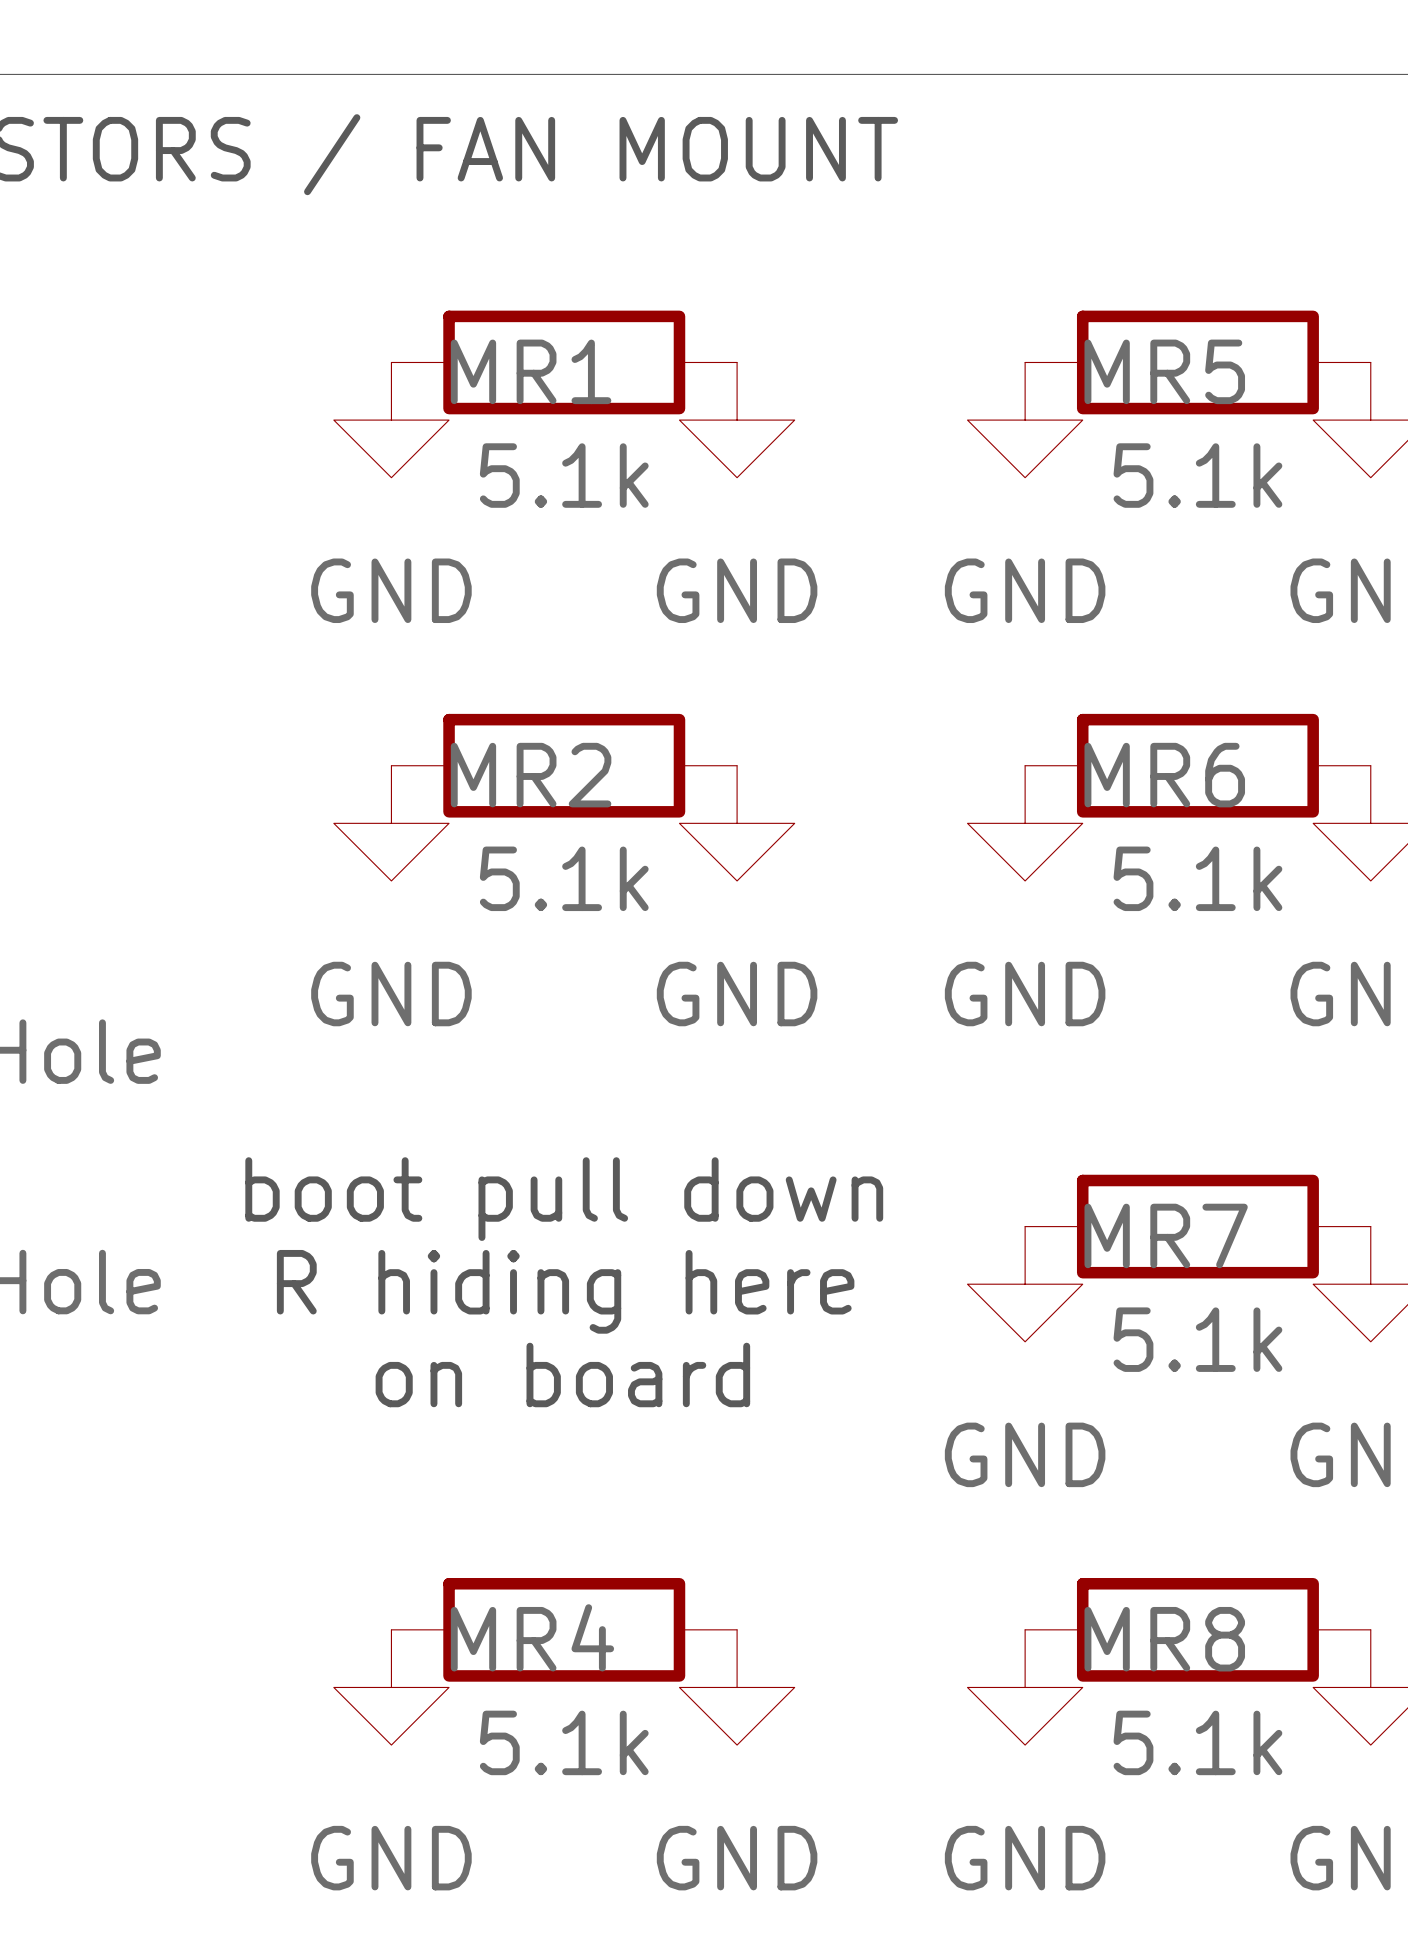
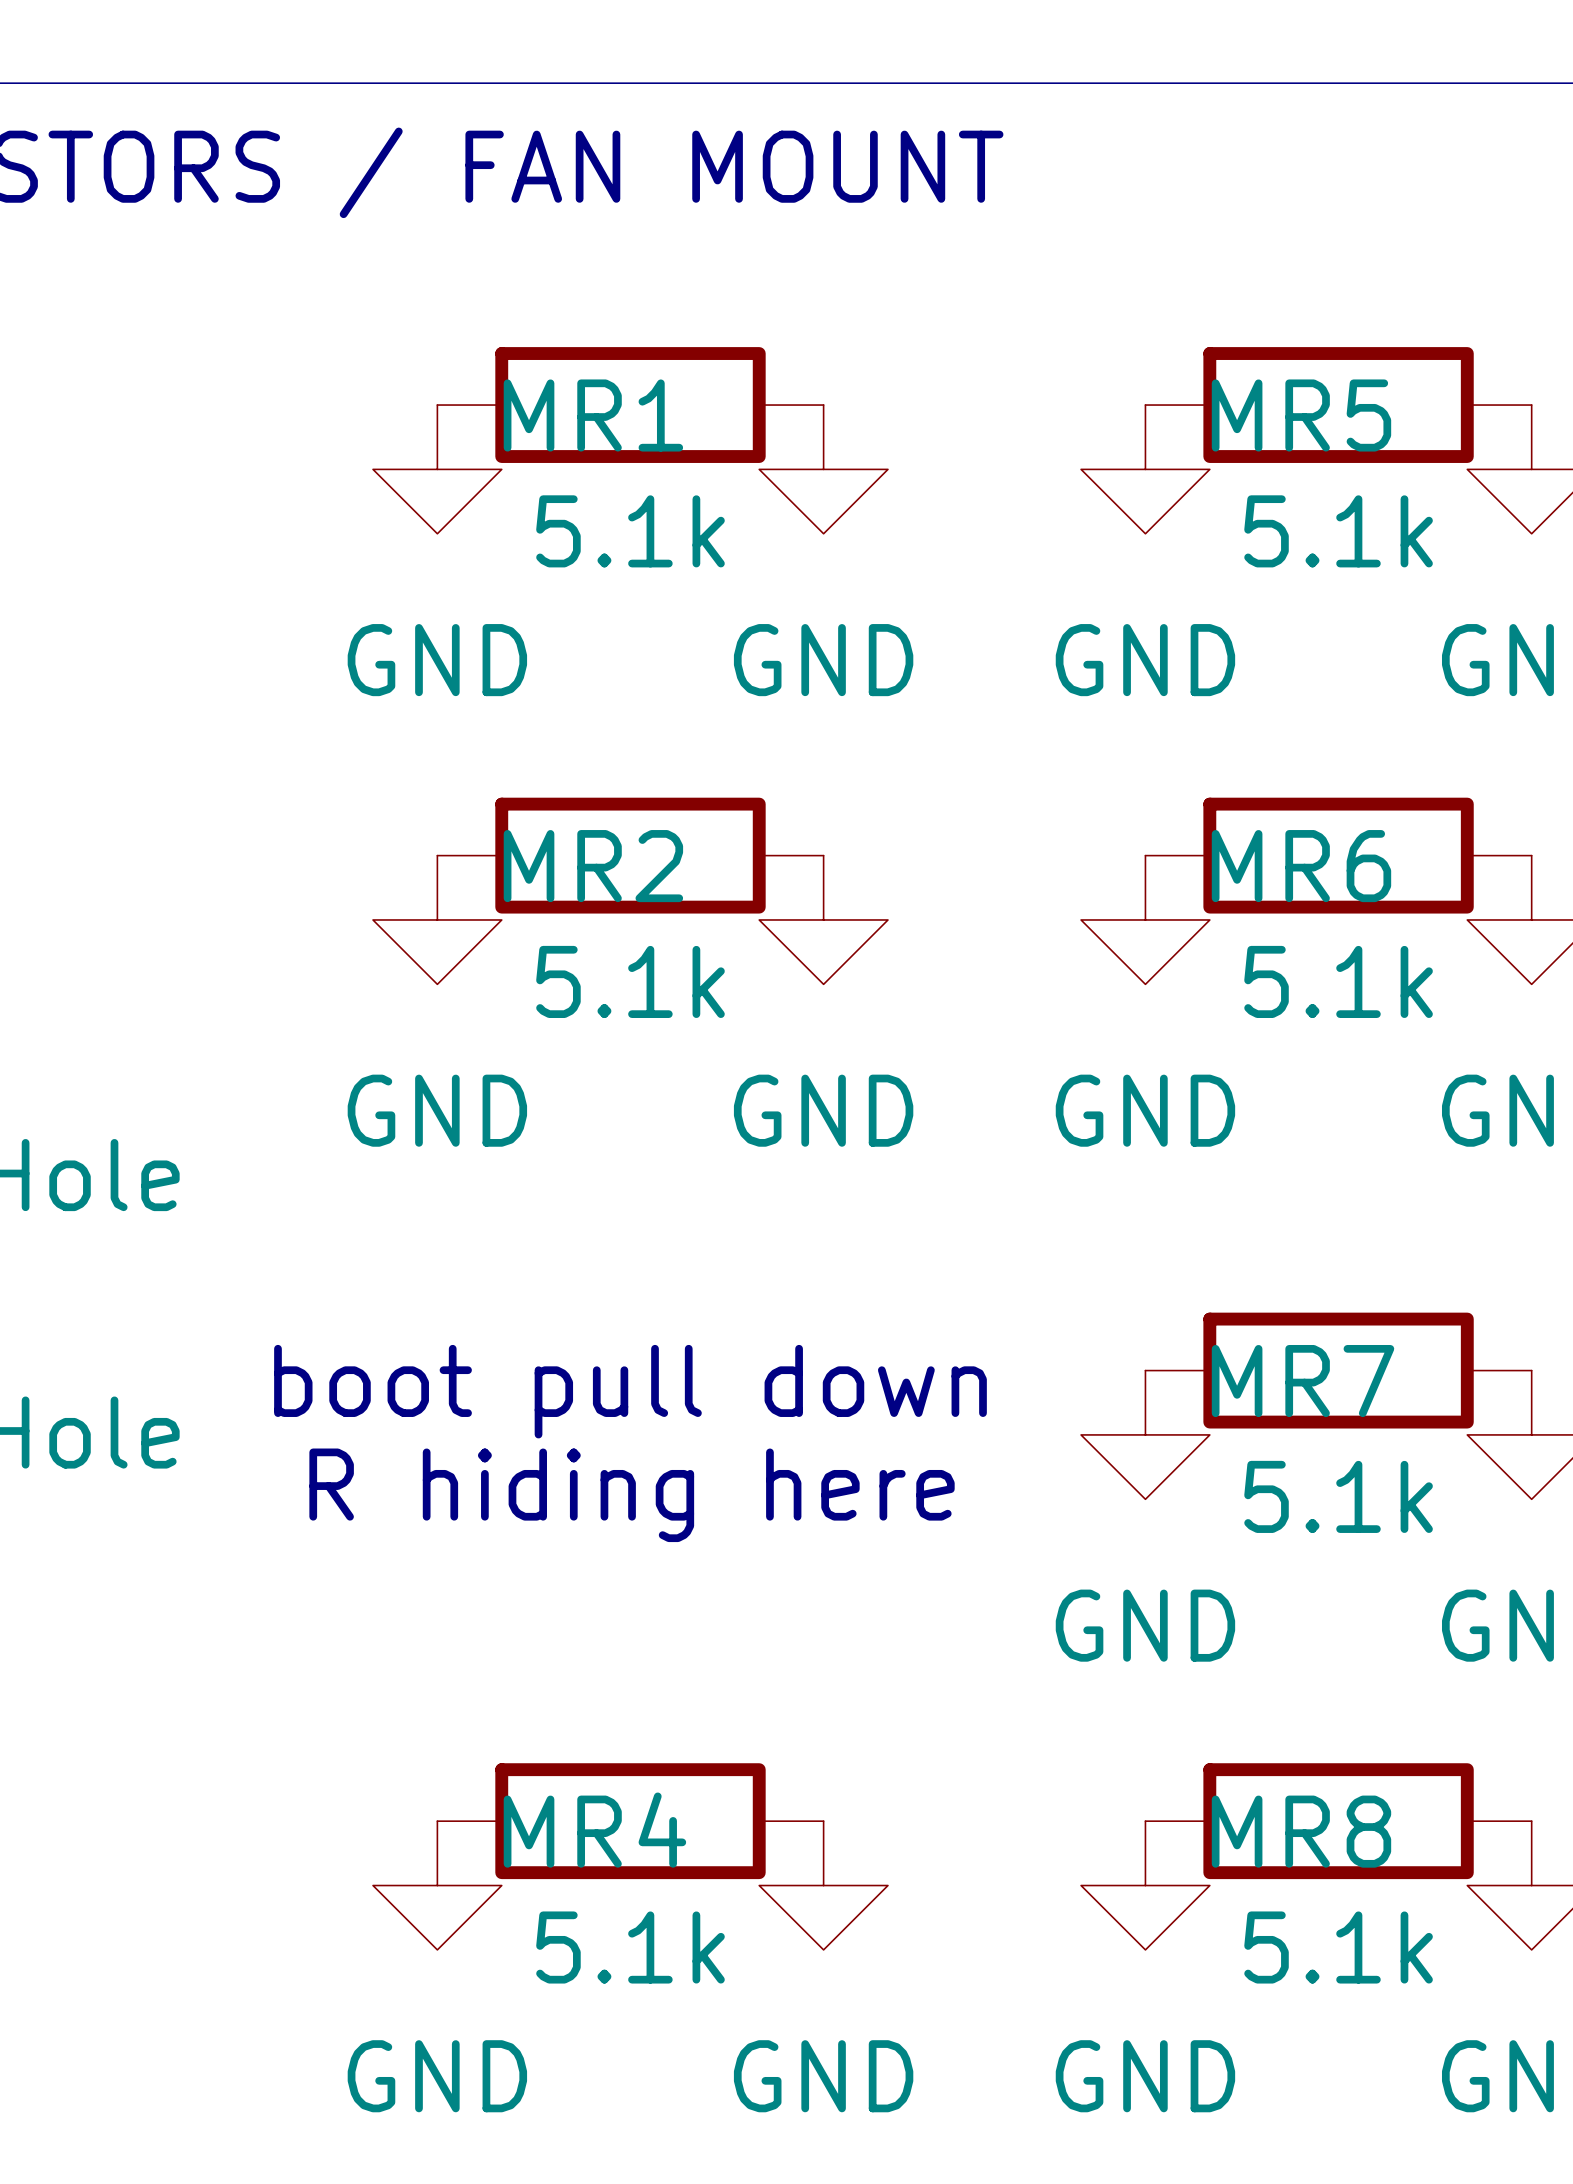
text position: boot pull down (564, 1199) -> boot pull down (630, 1391)
text position: R hiding here (565, 1291) -> R hiding here (632, 1495)
text: on board (562, 1374) -> none

